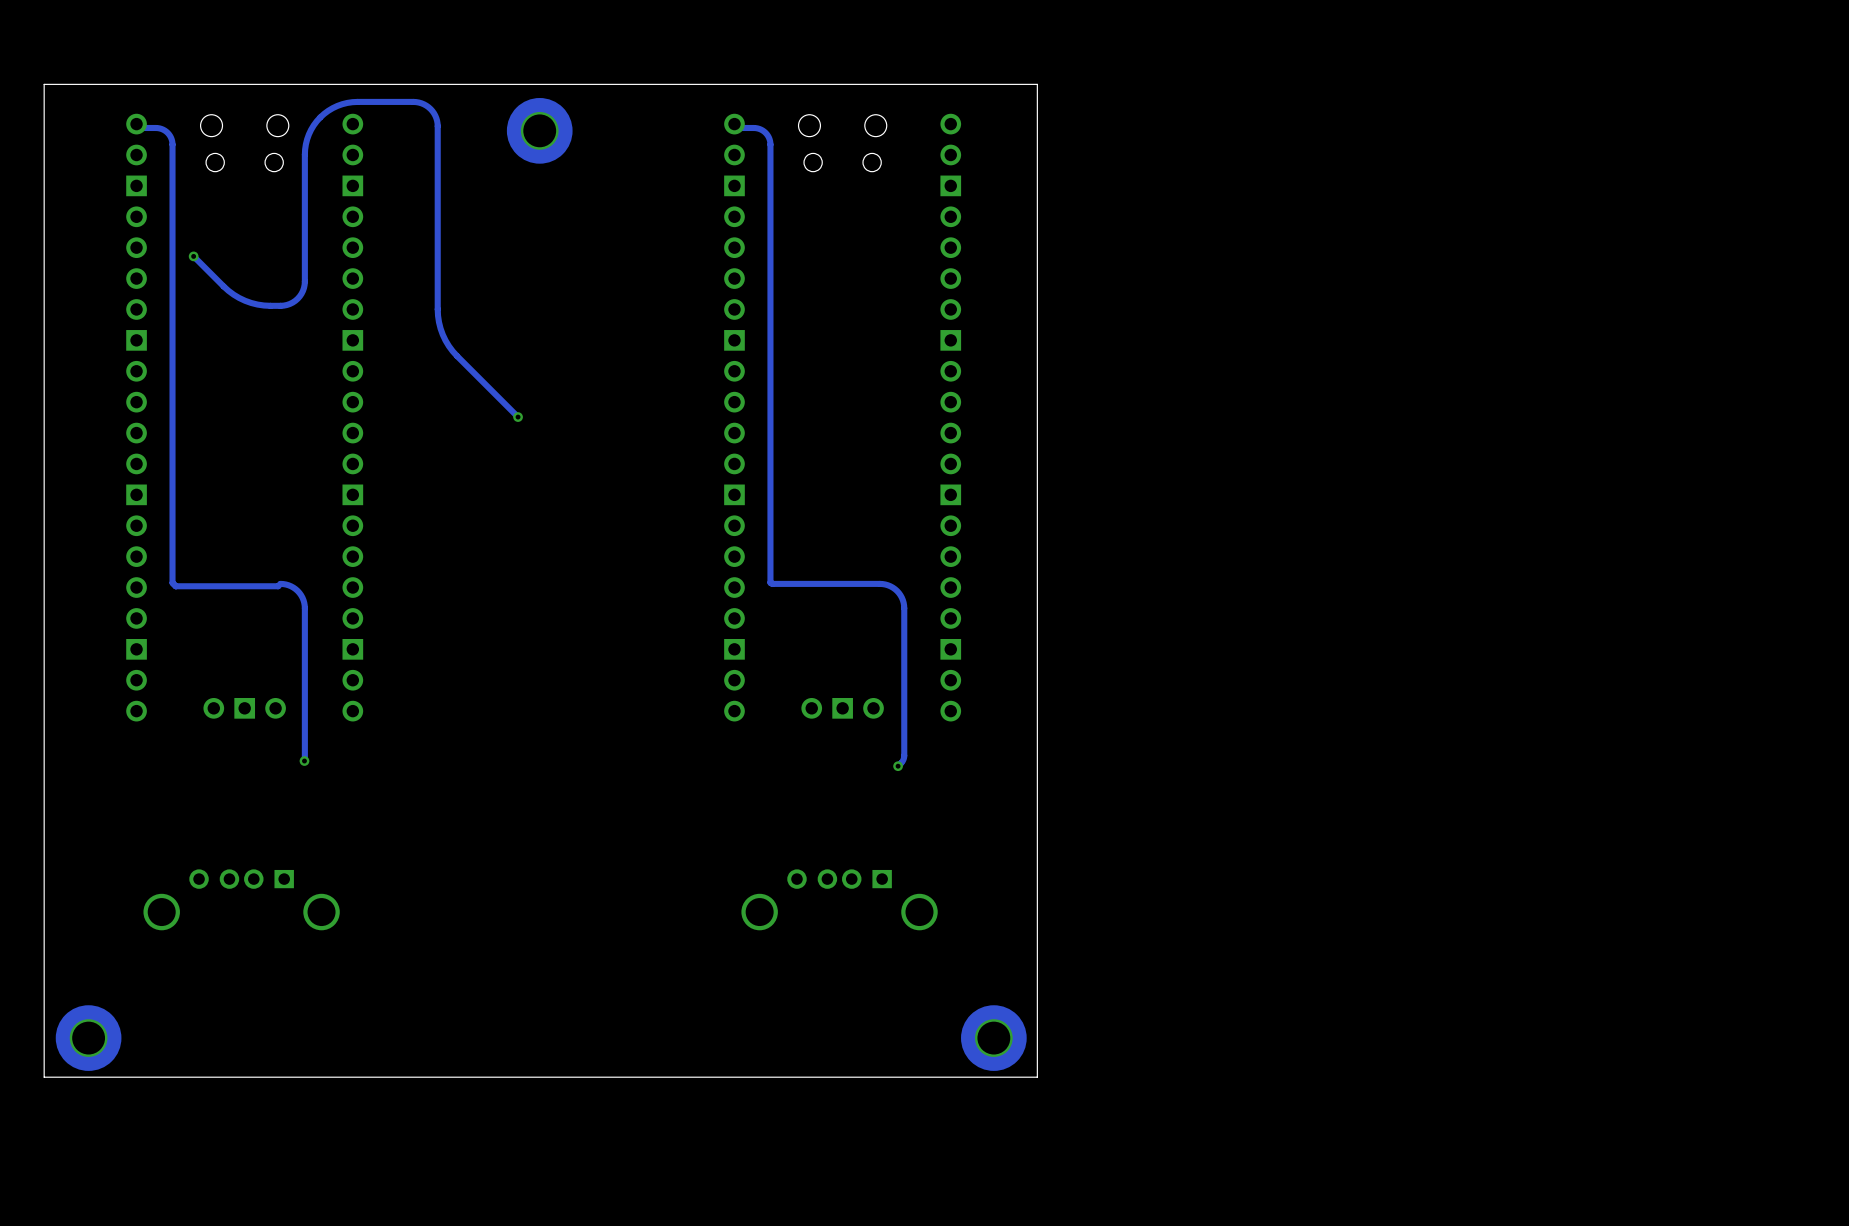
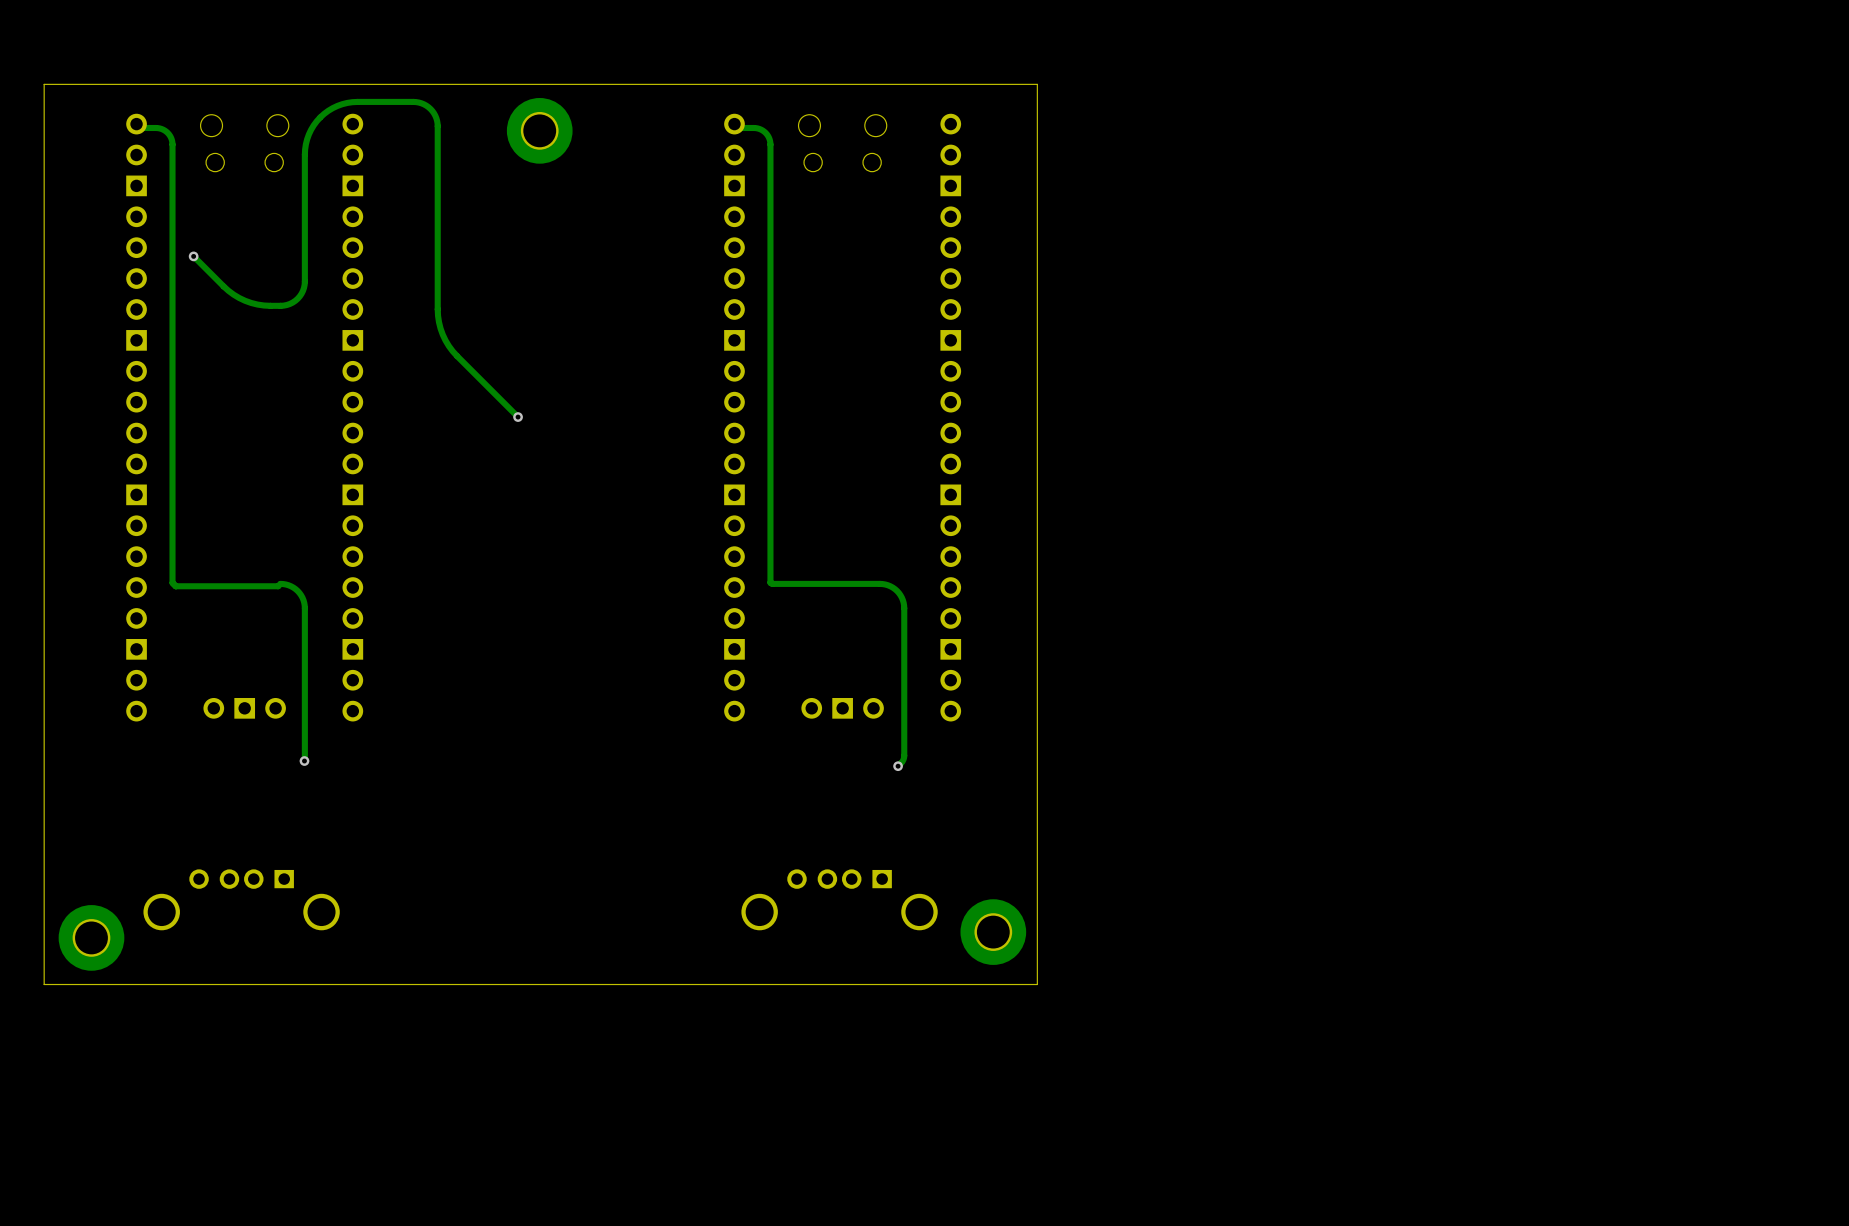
board edge: (1037, 984) (1037, 1077) (44, 1077) (44, 984) -> (1037, 984) (44, 984)
part position: (88, 1038) -> (91, 937)
part position: (993, 1038) -> (993, 932)

